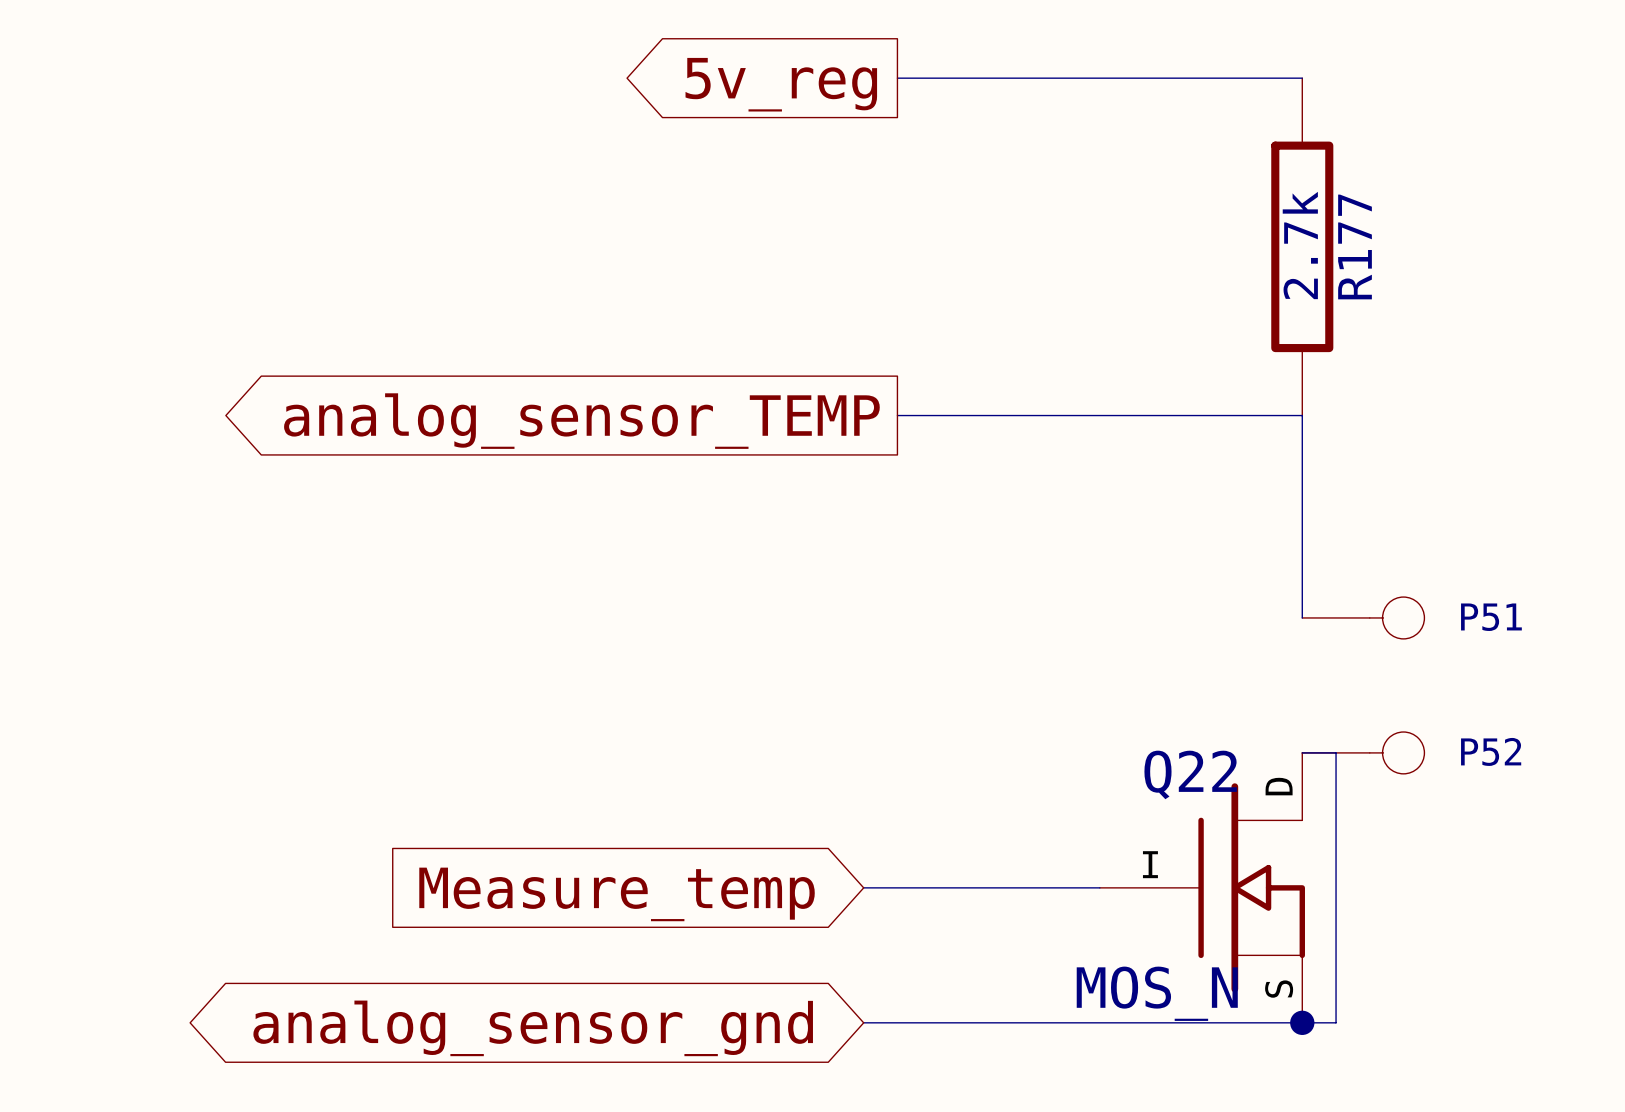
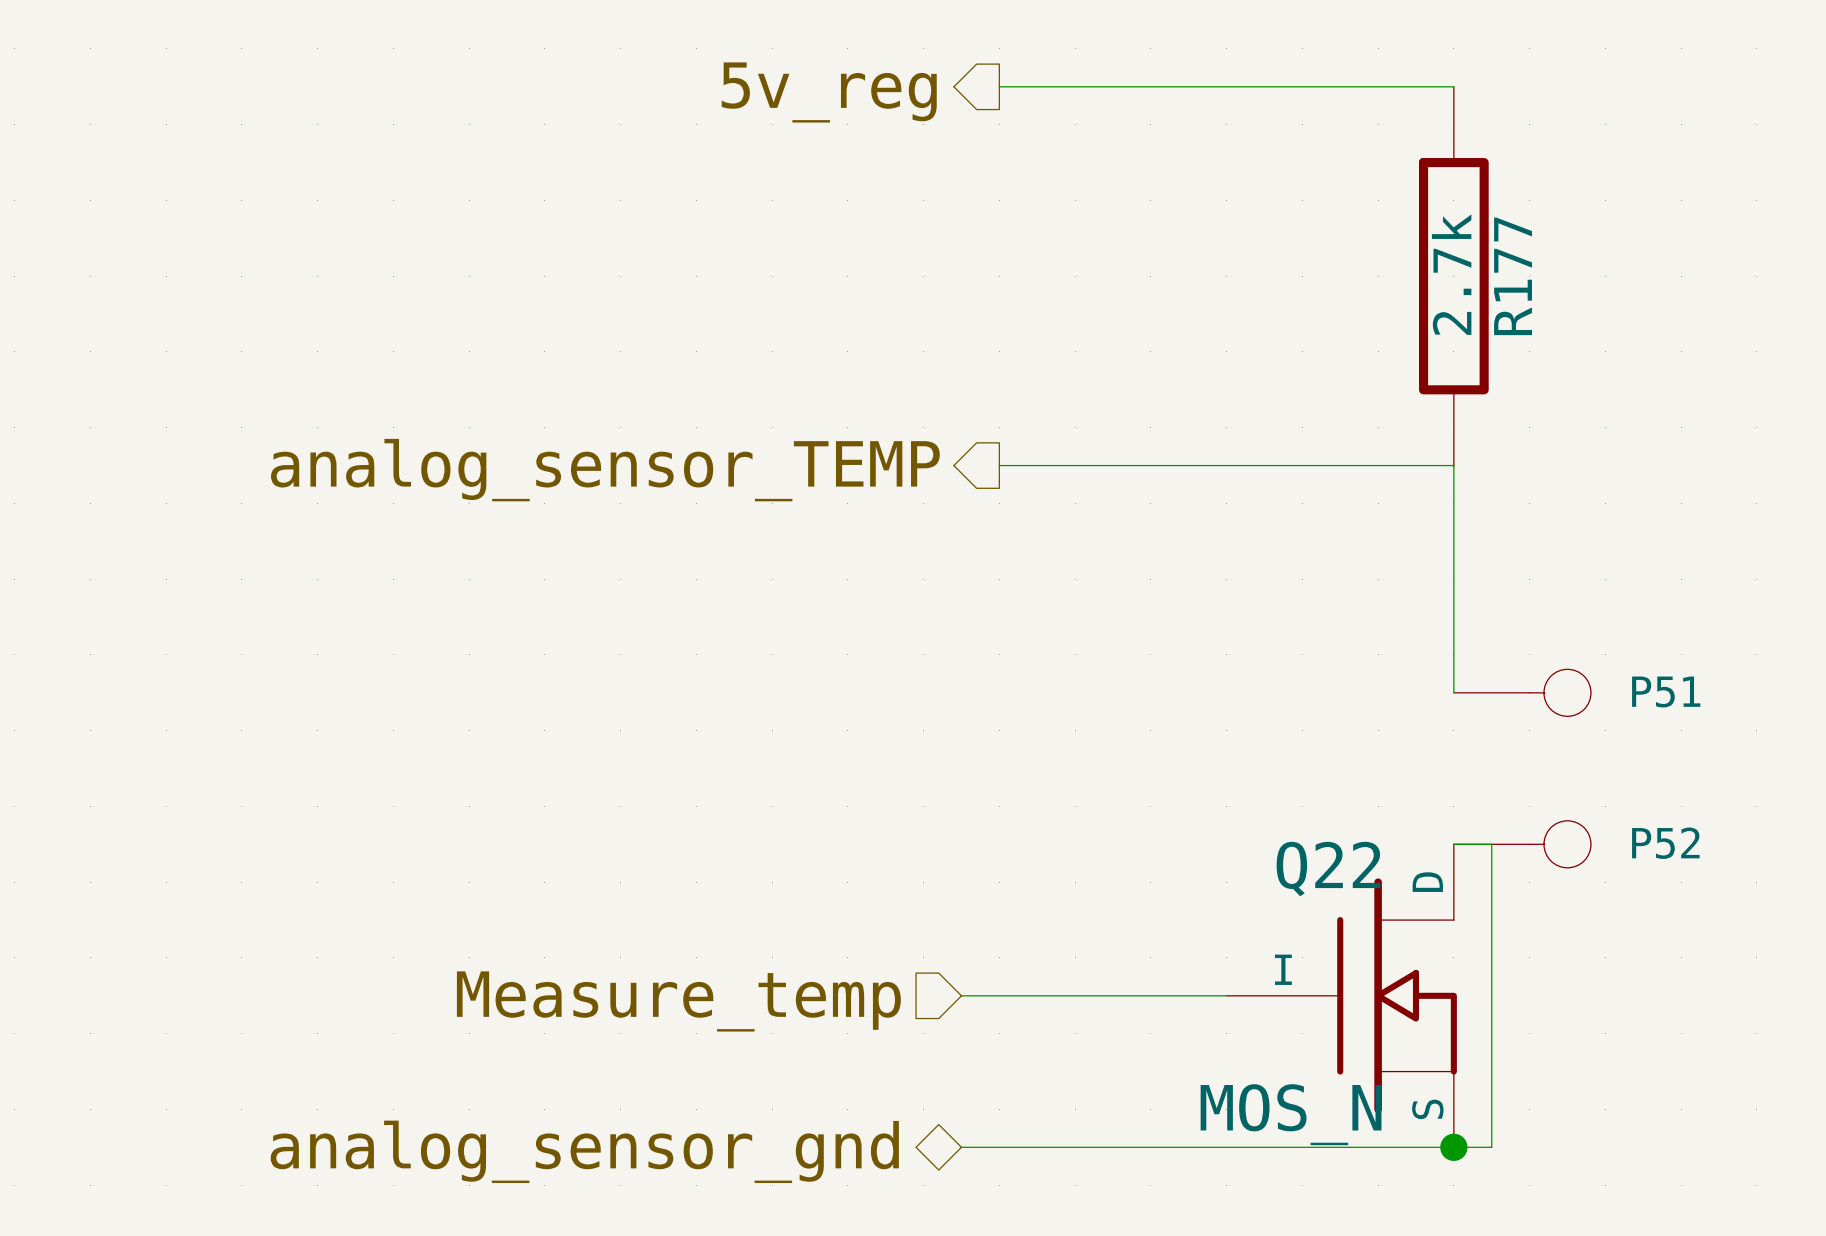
hierarchical label: none -> 5v_reg (829, 92)
global label: 5v_reg (781, 84) -> none
hierarchical label: none -> analog_sensor_TEMP (605, 470)
global label: analog_sensor_TEMP (581, 421) -> none
hierarchical label: none -> Measure_temp (678, 1001)
global label: Measure_temp (617, 894) -> none
hierarchical label: none -> analog_sensor_gnd (584, 1151)
global label: analog_sensor_gnd (533, 1028) -> none

